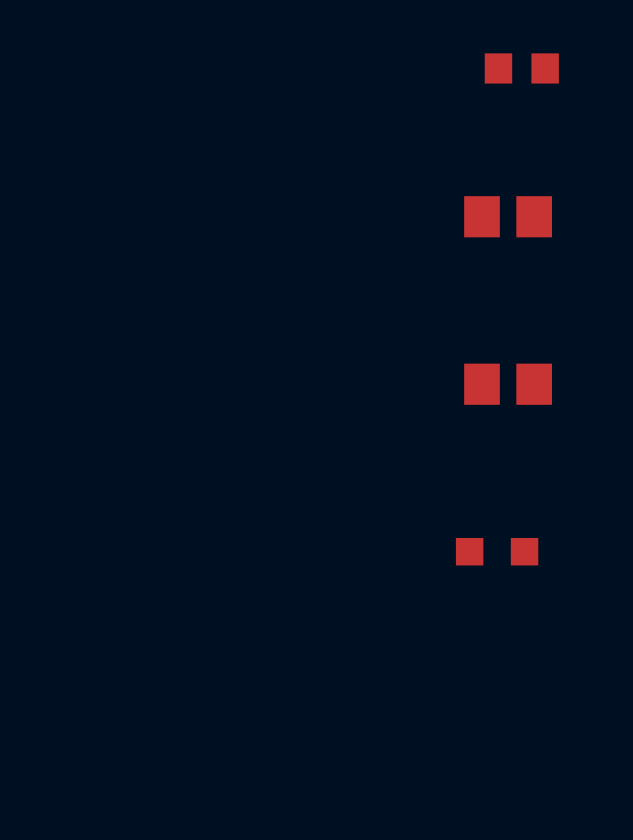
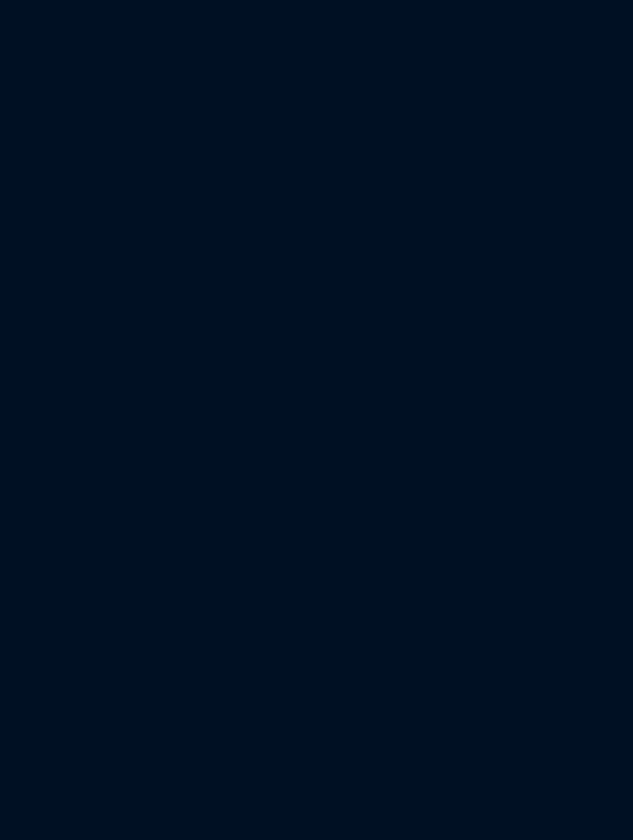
part: (521, 68) -> none
part: (508, 216) -> none
part: (508, 384) -> none
part: (497, 551) -> none

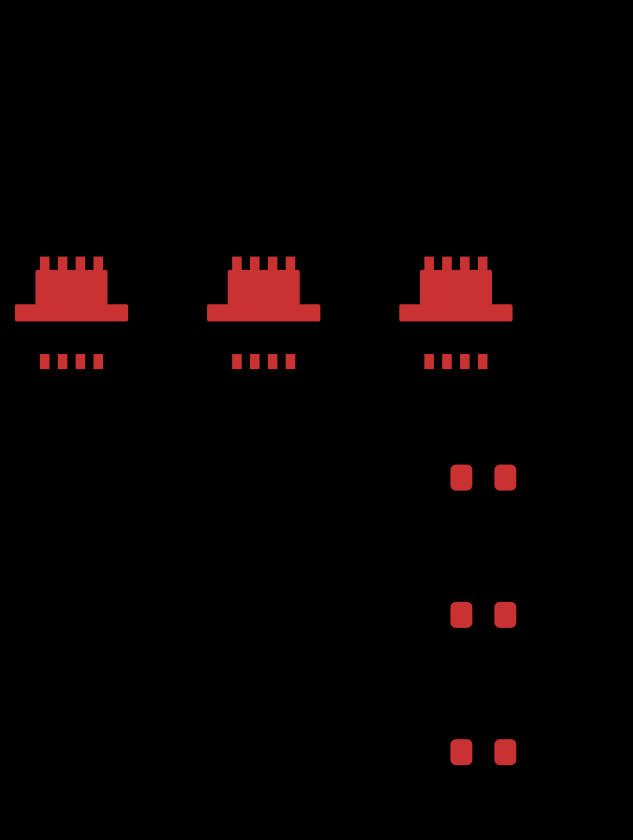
part: none -> (71, 312)
part: none -> (263, 312)
part: none -> (455, 312)
part: none -> (483, 477)
part: none -> (483, 614)
part: none -> (483, 752)

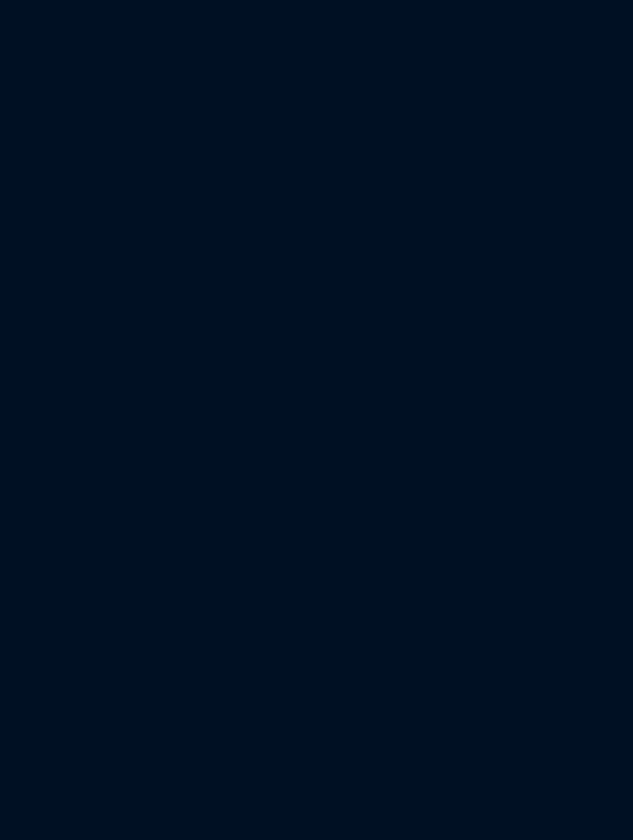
part: (71, 312) -> none
part: (263, 312) -> none
part: (455, 312) -> none
part: (483, 477) -> none
part: (483, 614) -> none
part: (483, 752) -> none

